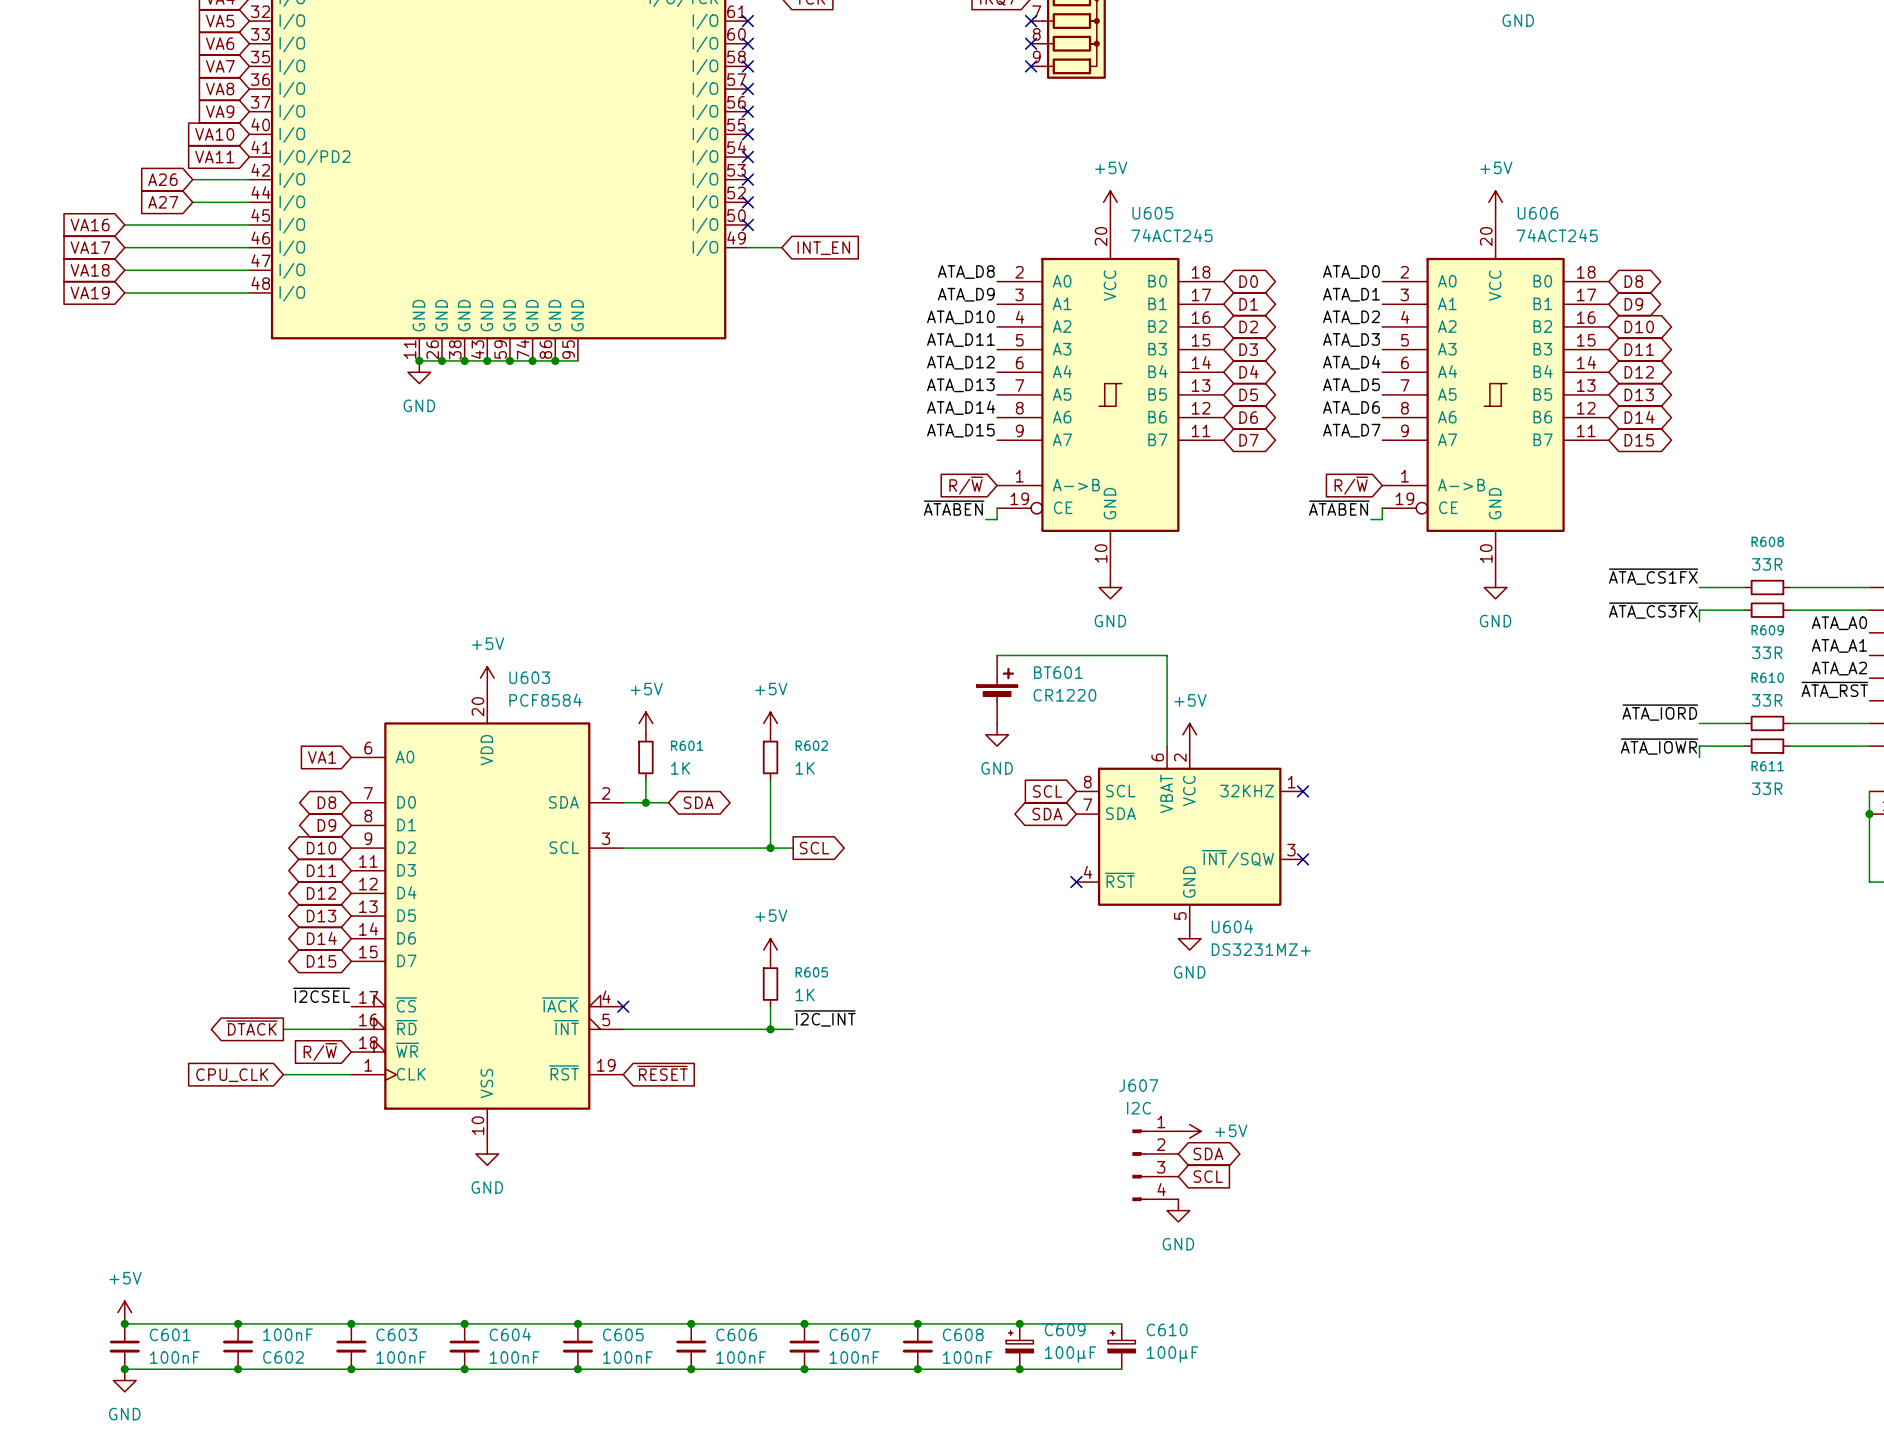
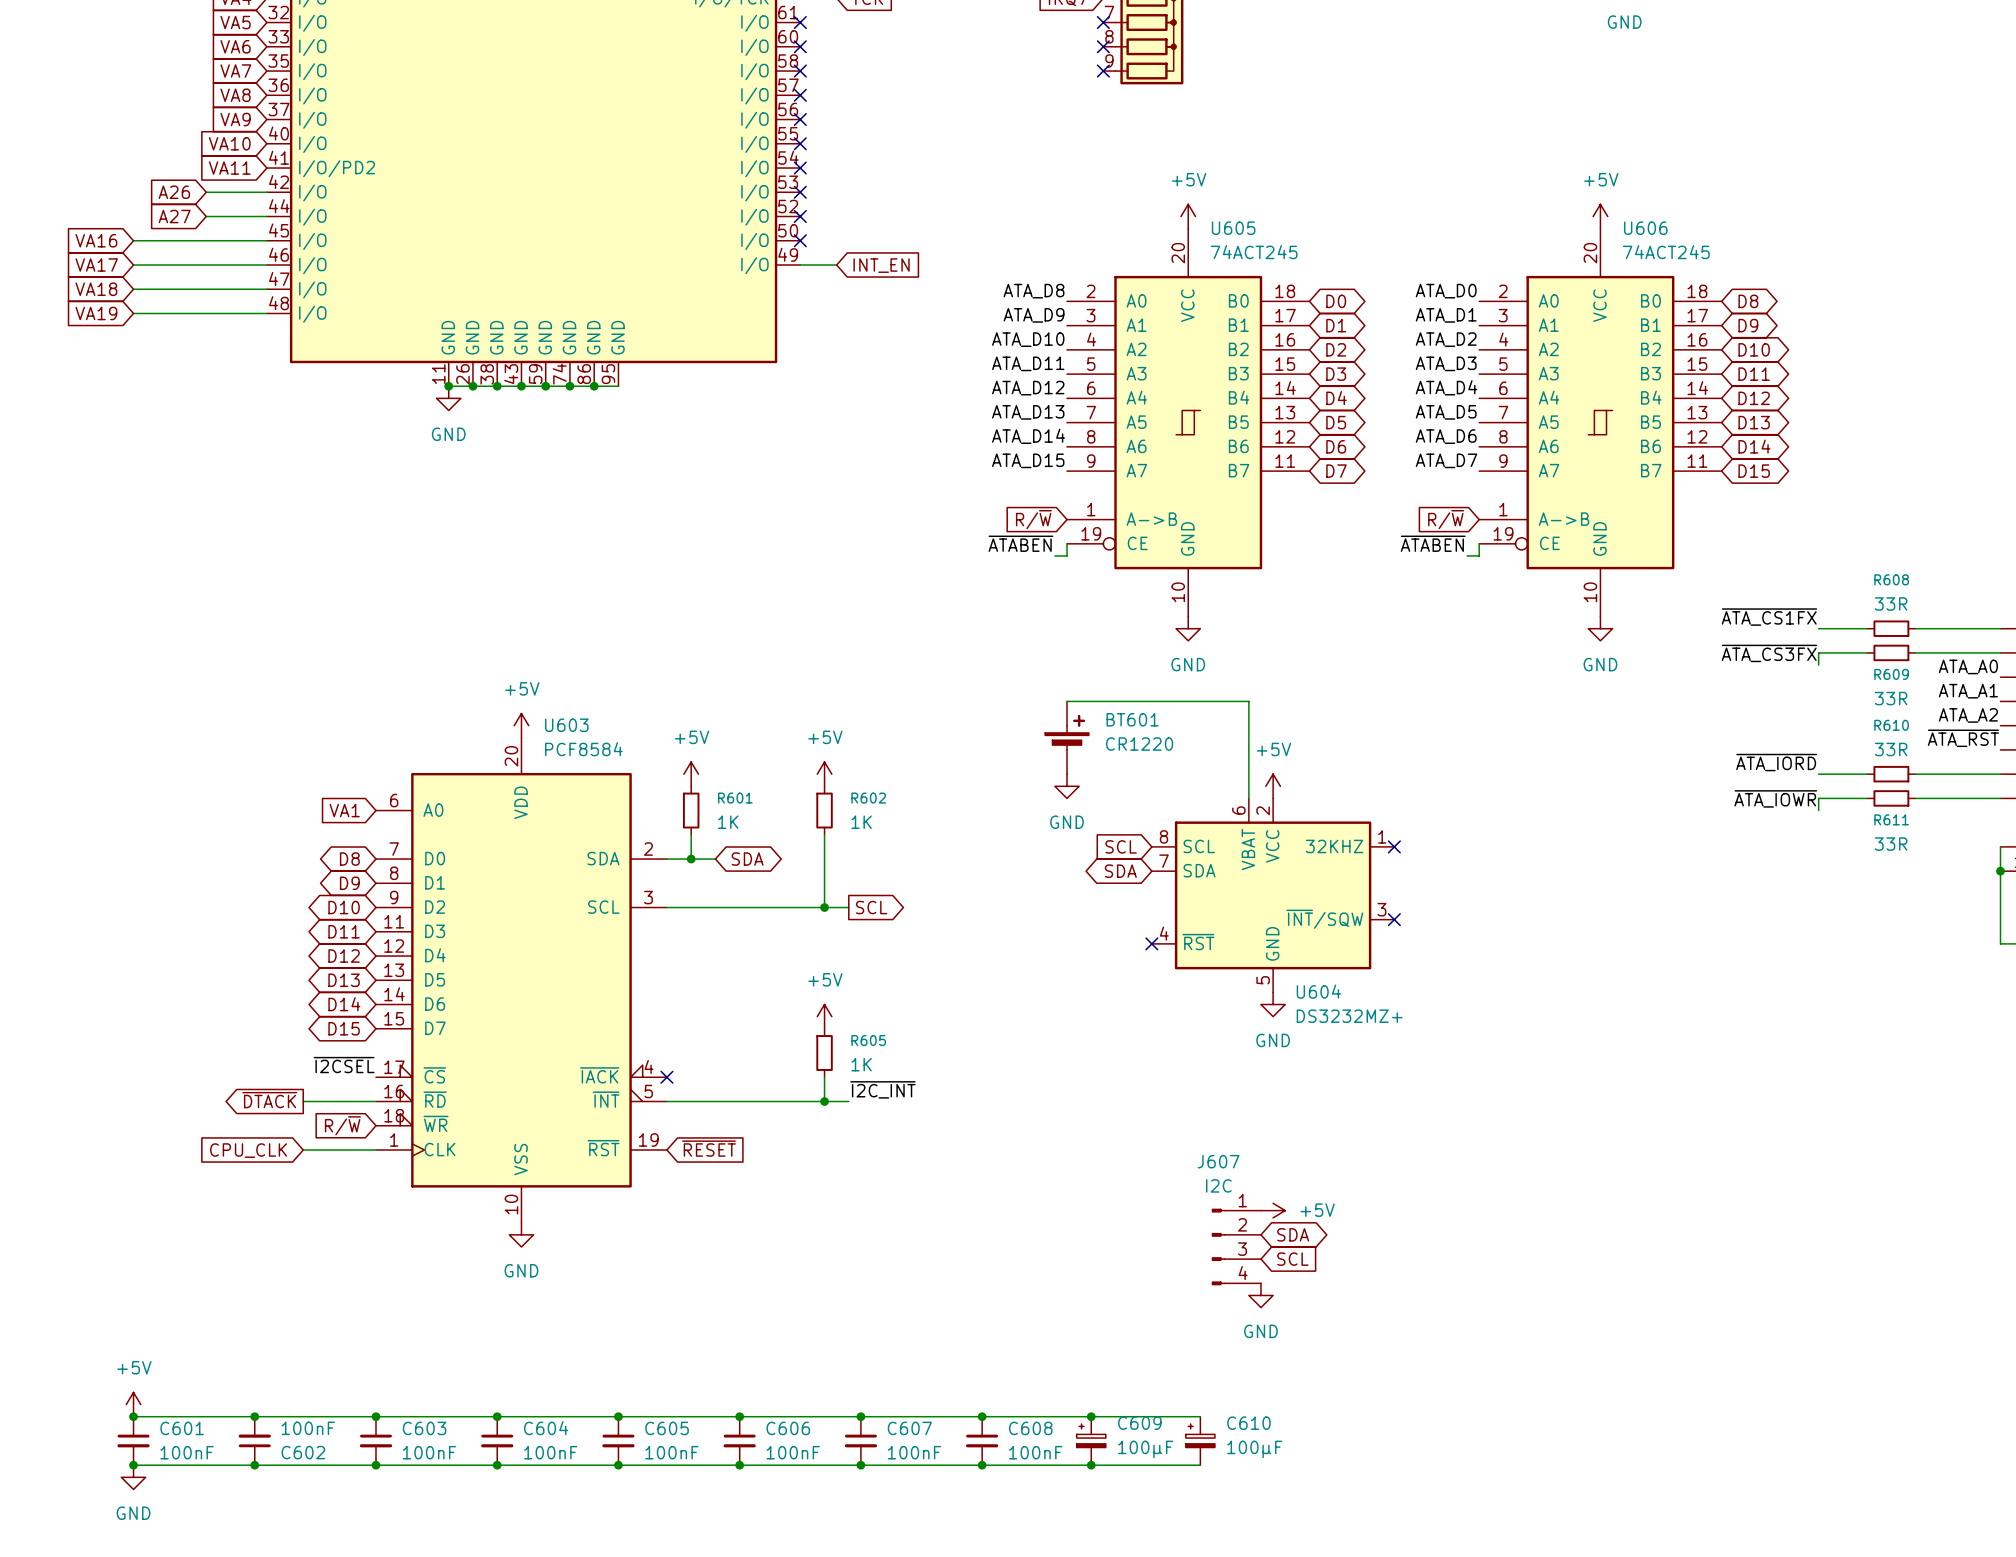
U604 value: DS3231MZ+ (1261, 949) -> DS3232MZ+ (1349, 1016)

